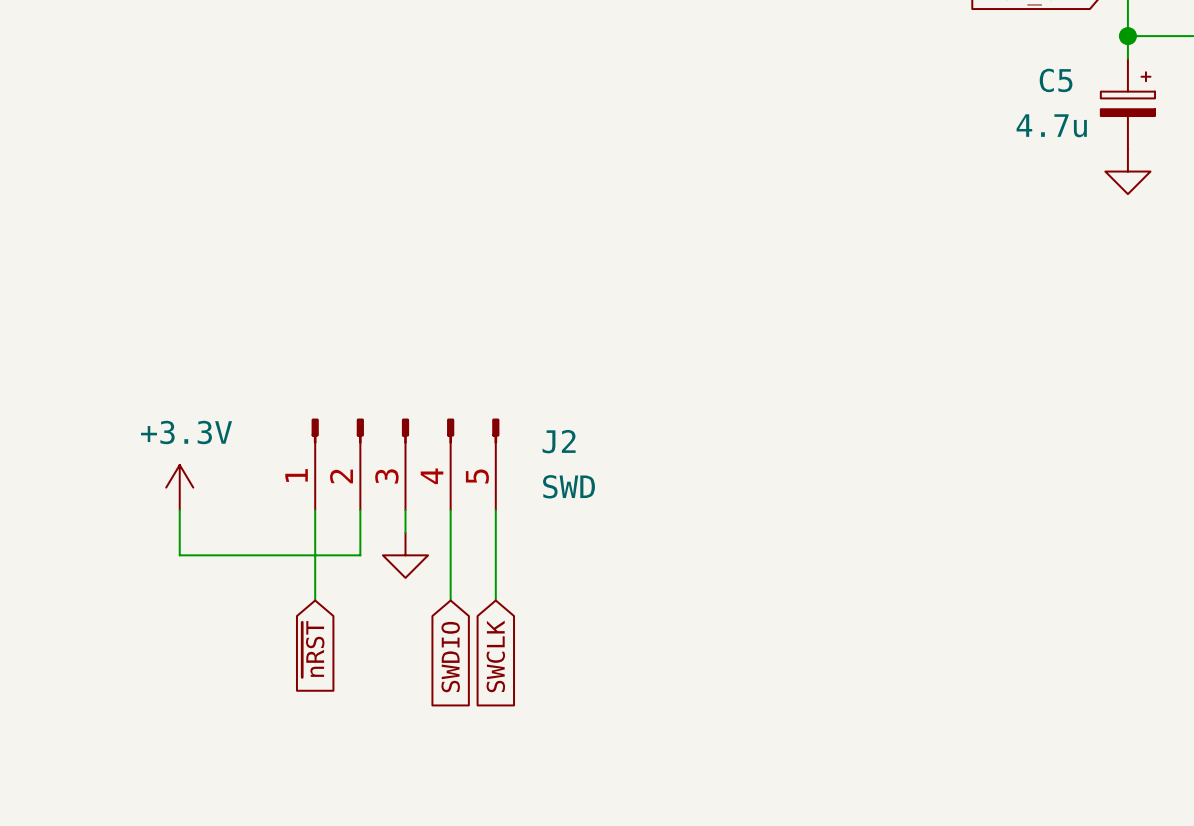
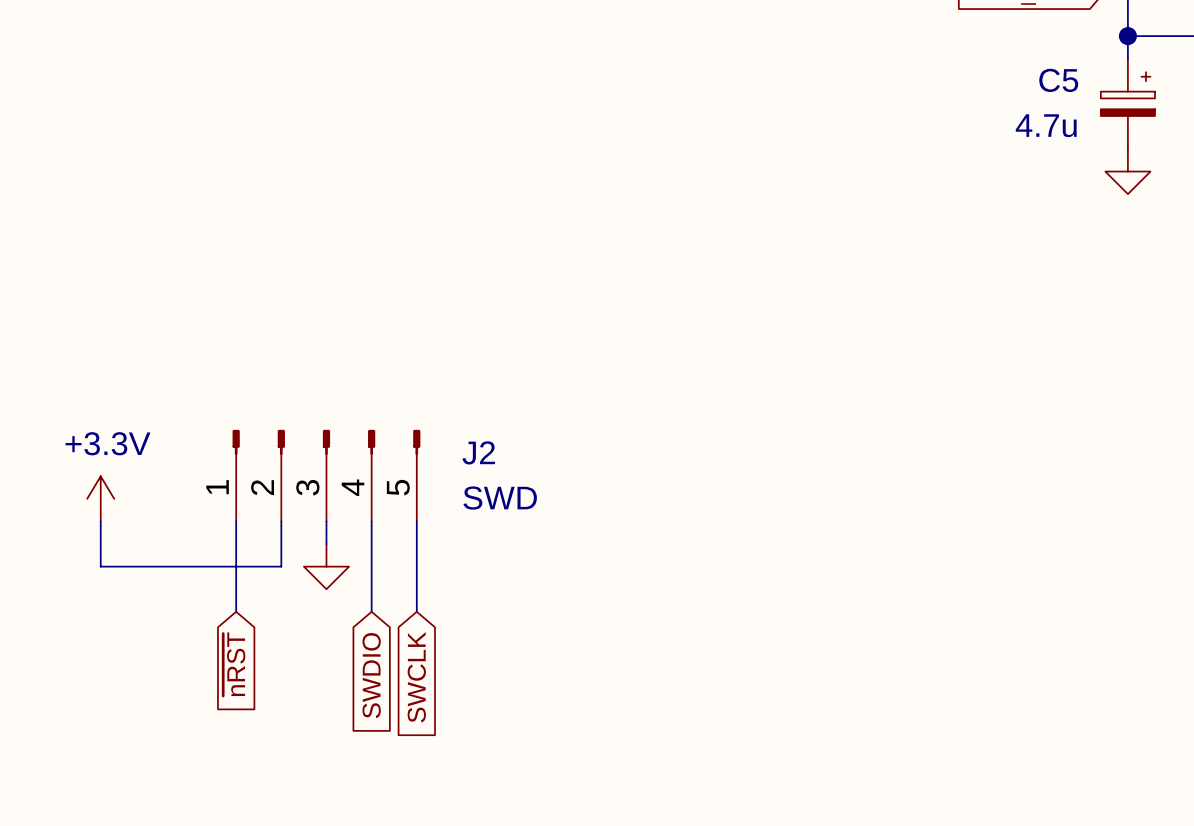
J2 position: (405, 464) -> (326, 475)
power symbol position: +3.3V (179, 487) -> +3.3V (100, 498)
wire: (179, 510) (179, 555) (360, 555) (360, 510) -> (100, 521) (100, 566) (281, 566) (281, 521)
wire: (315, 510) (315, 600) -> (236, 521) (236, 611)
wire: (405, 510) (405, 532) -> (326, 521) (326, 544)
wire: (450, 510) (450, 600) -> (371, 521) (371, 611)
wire: (495, 510) (495, 600) -> (416, 521) (416, 611)
power symbol position: (405, 555) -> (326, 566)
global label position: ~{nRST} (313, 649) -> ~{nRST} (234, 664)
global label position: SWCLK (495, 656) -> SWCLK (416, 677)
global label position: SWDIO (450, 657) -> SWDIO (371, 675)

